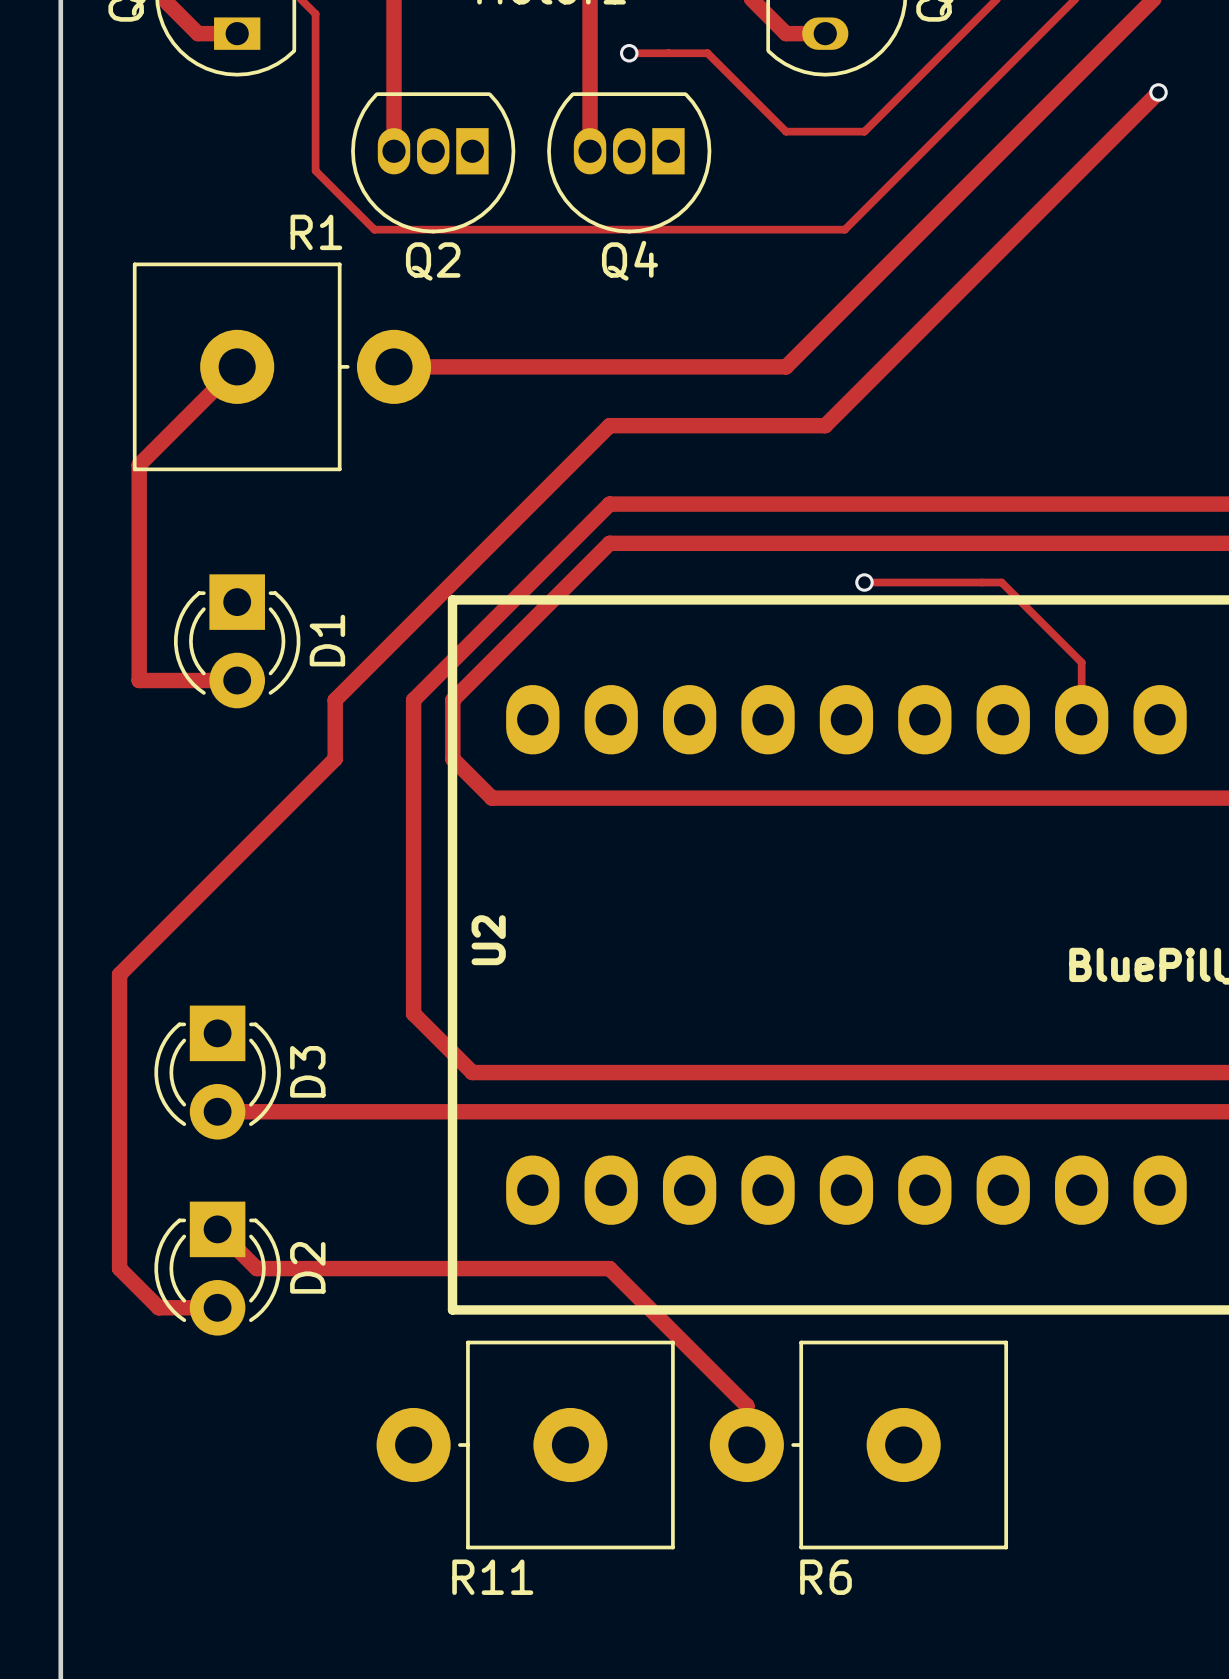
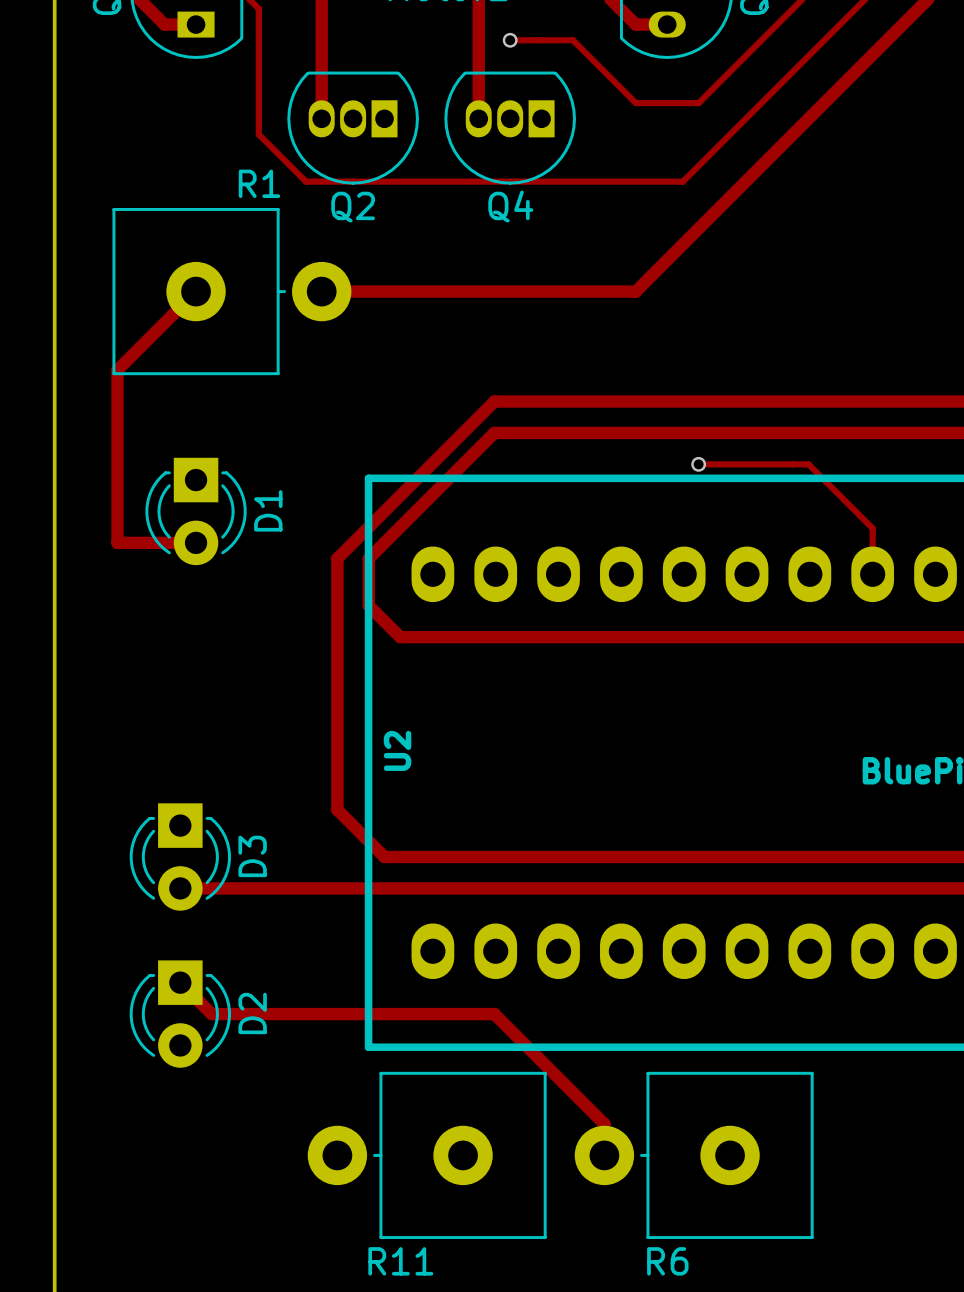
track: (1158, 92) (825, 425) (609, 425) (335, 700) (335, 758) (119, 974) (119, 1268) (158, 1307) (217, 1307) -> none
via: (1158, 92) -> none

